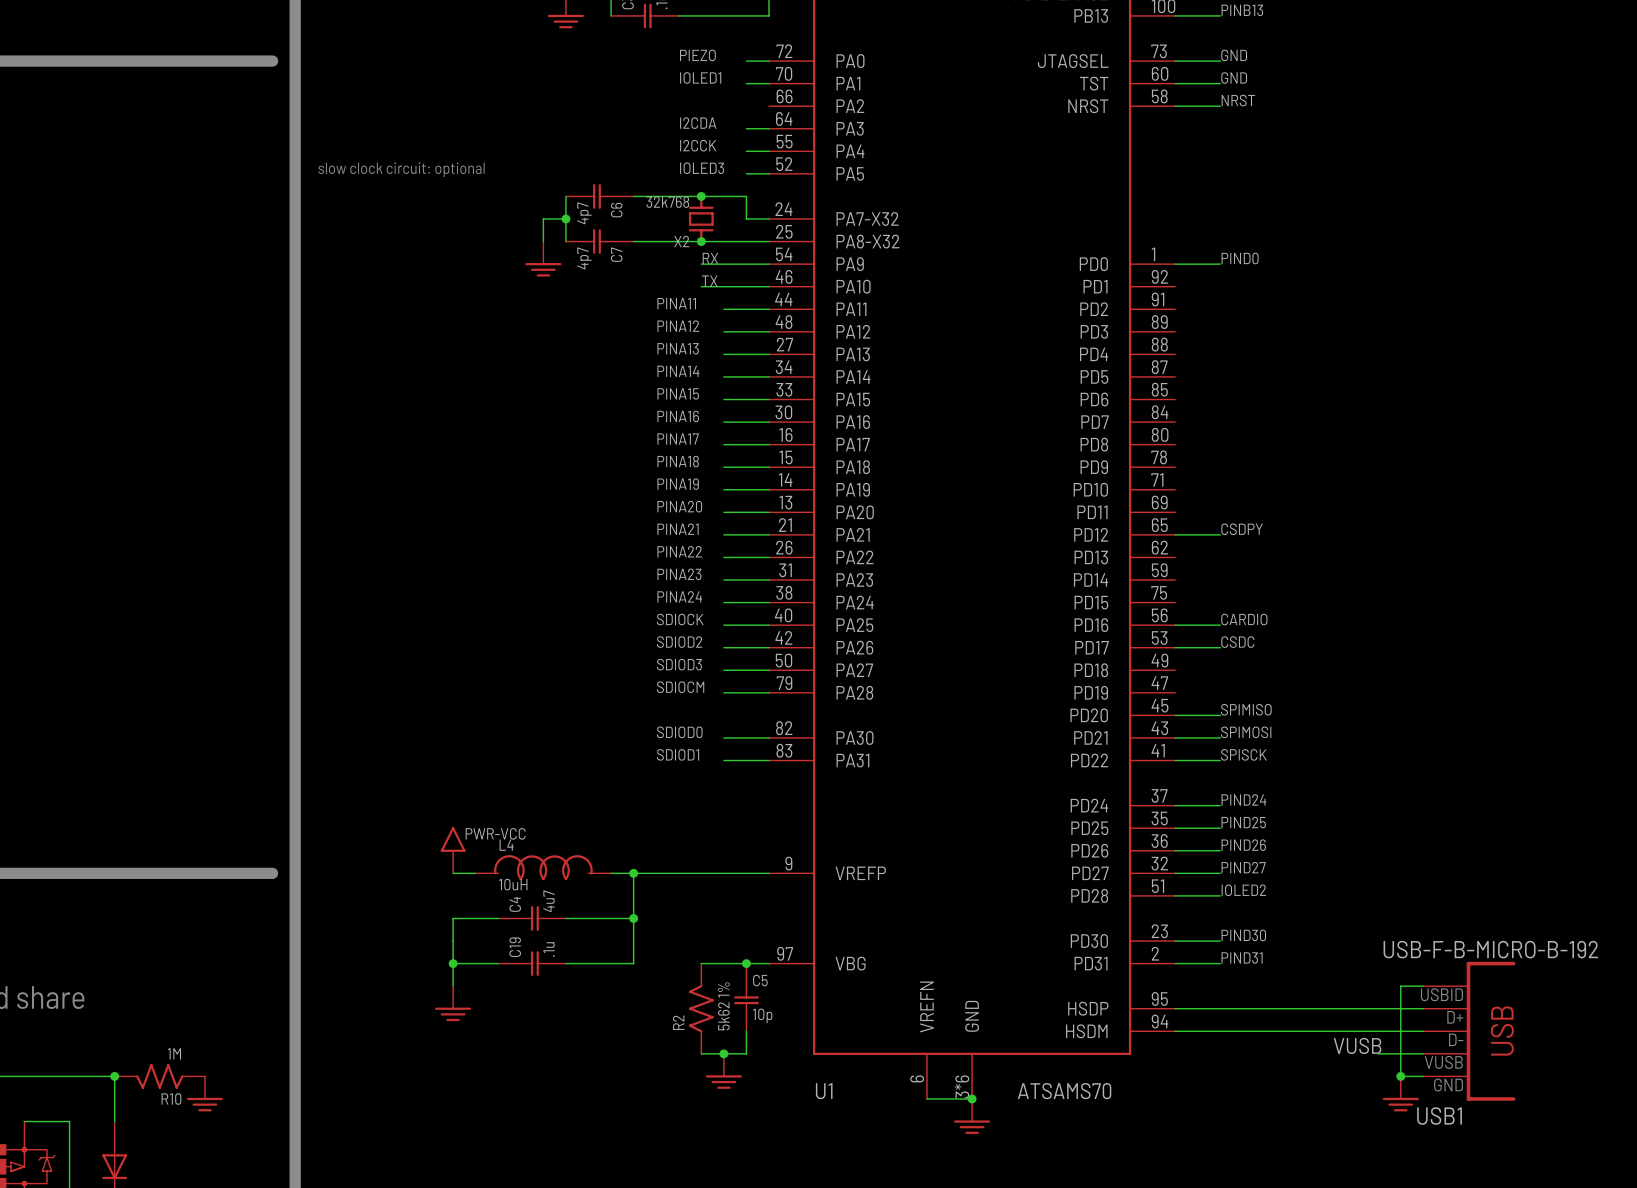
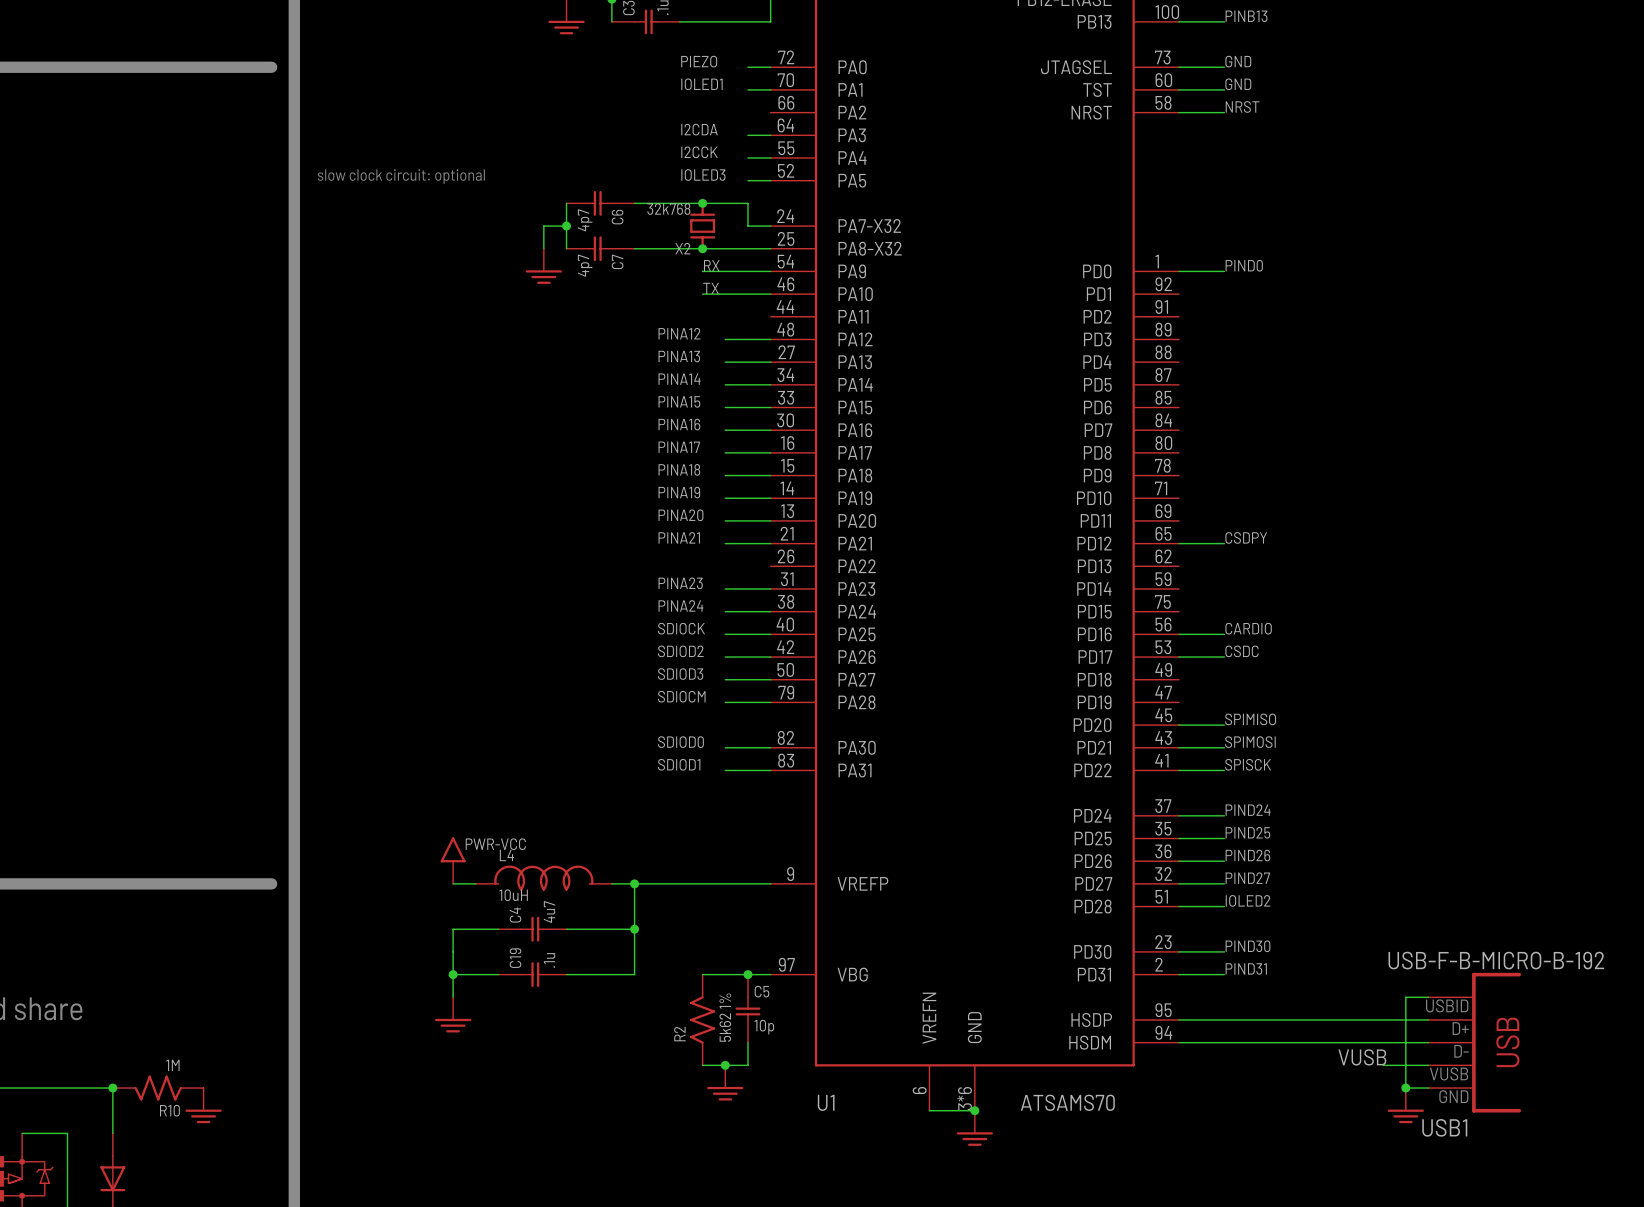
label: PINA11 (676, 303) -> none
wire: (723, 309) (769, 309) -> none
label: PINA22 (679, 551) -> none
wire: (723, 557) (769, 557) -> none

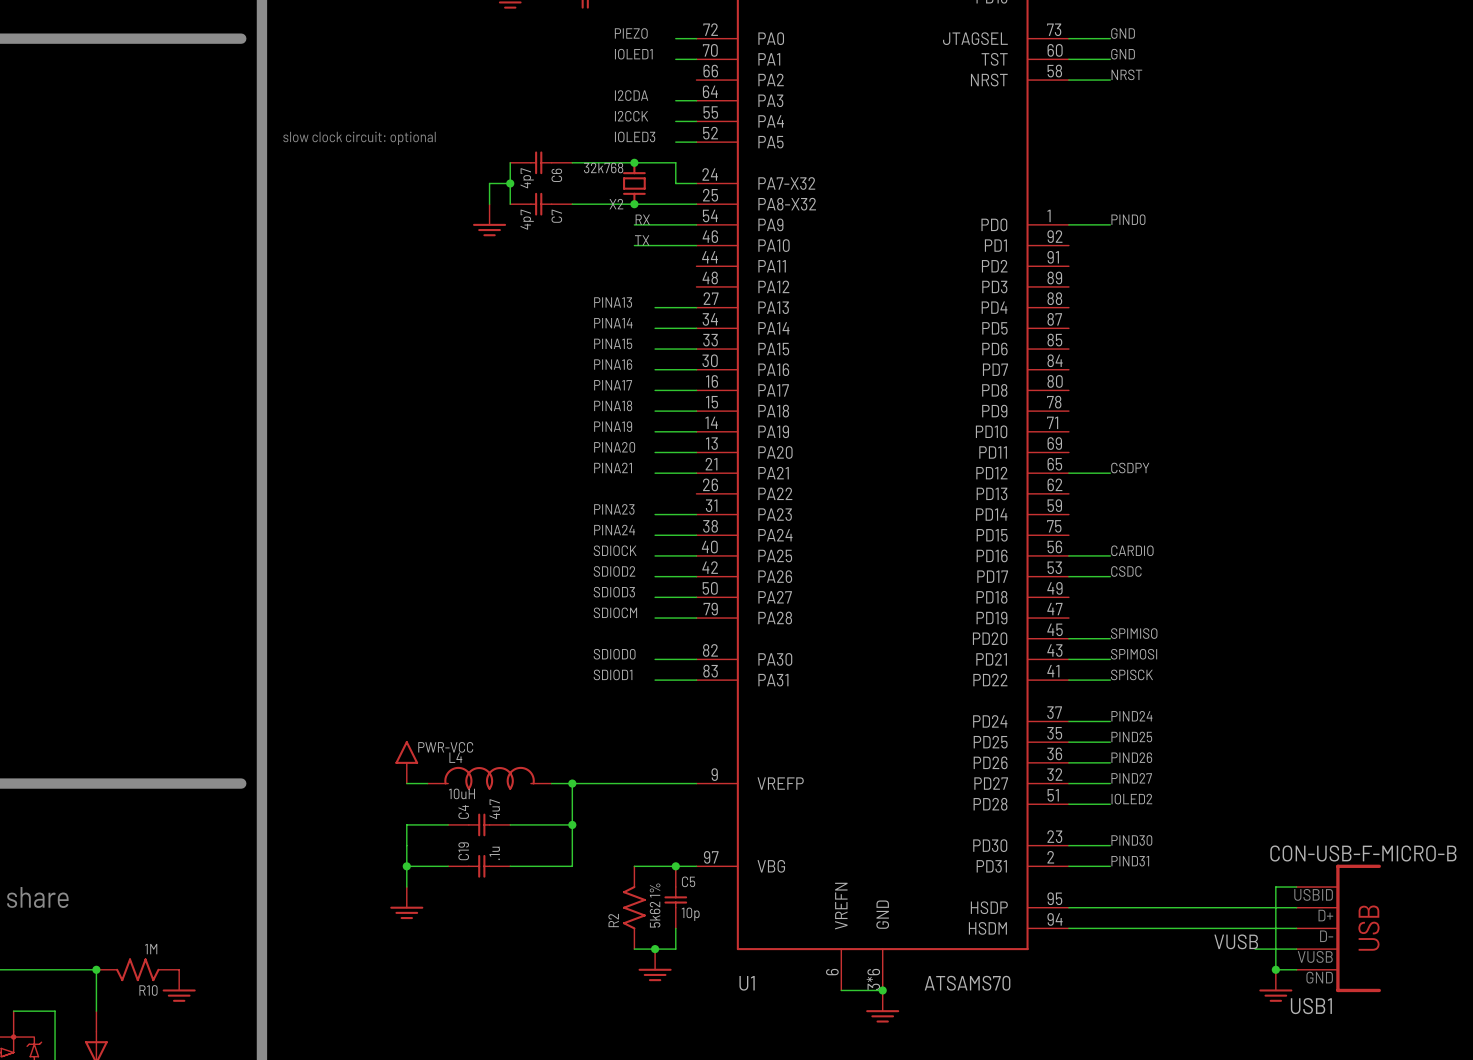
label: PINA12 (679, 333) -> none
wire: (725, 339) (770, 339) -> none
USB1 value: USB-F-B-MICRO-B-192 (1496, 960) -> CON-USB-F-MICRO-B (1363, 853)

